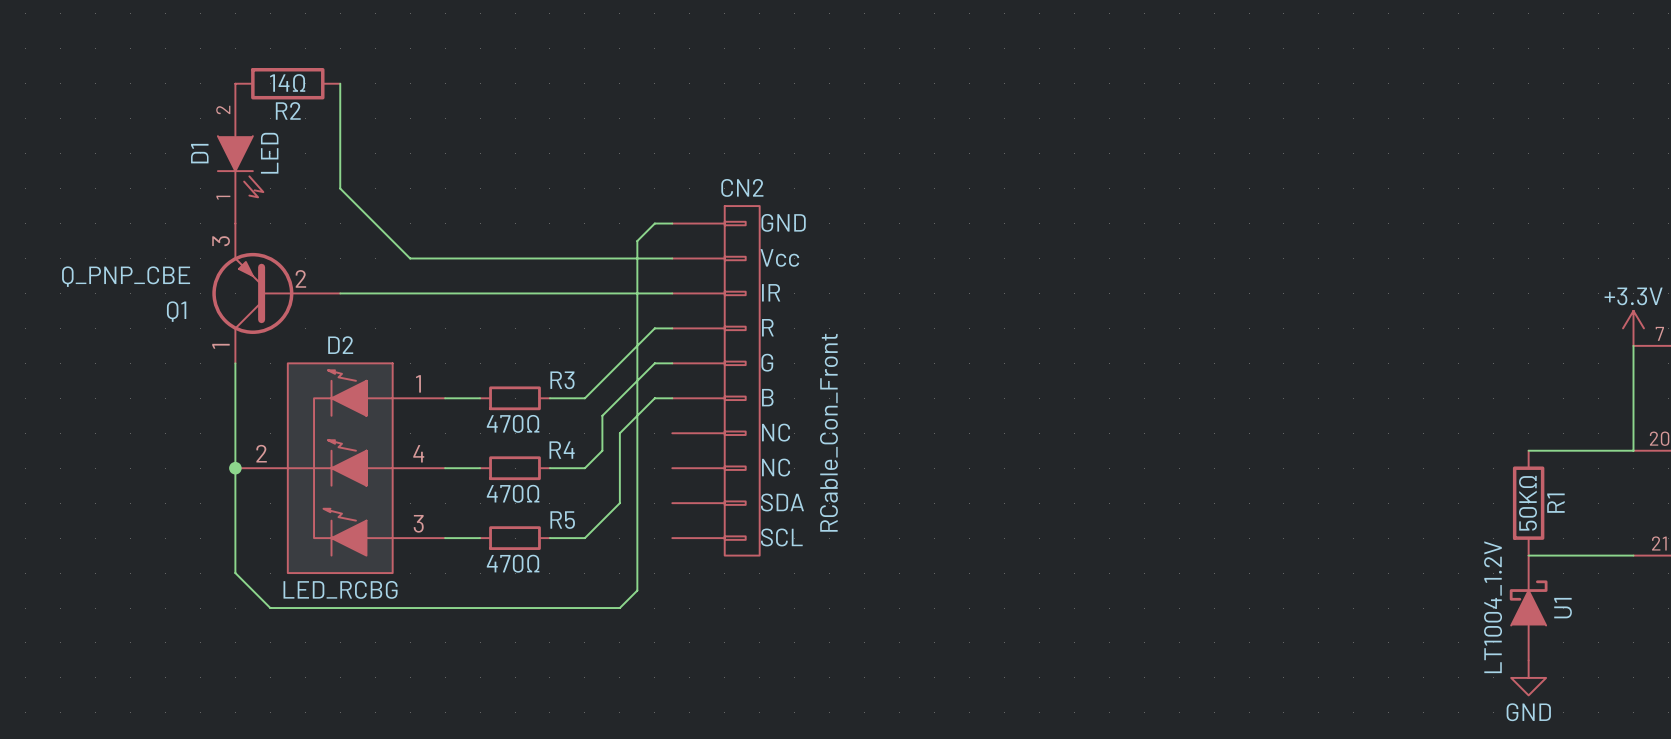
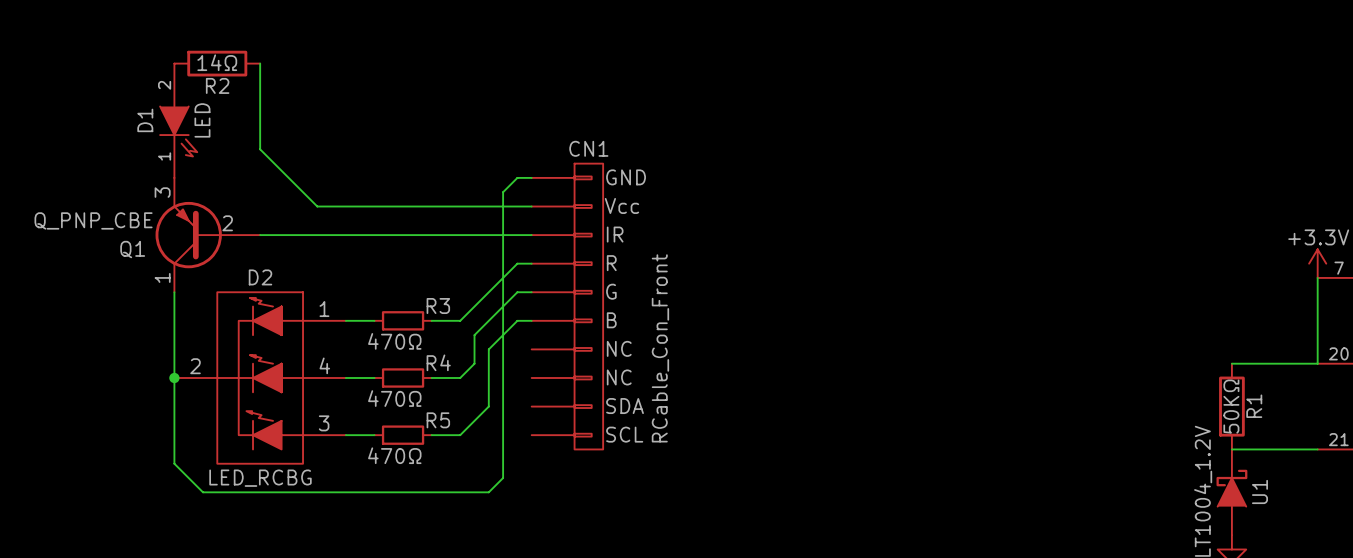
CN2 name: CN2 (742, 187) -> CN1 (588, 148)

